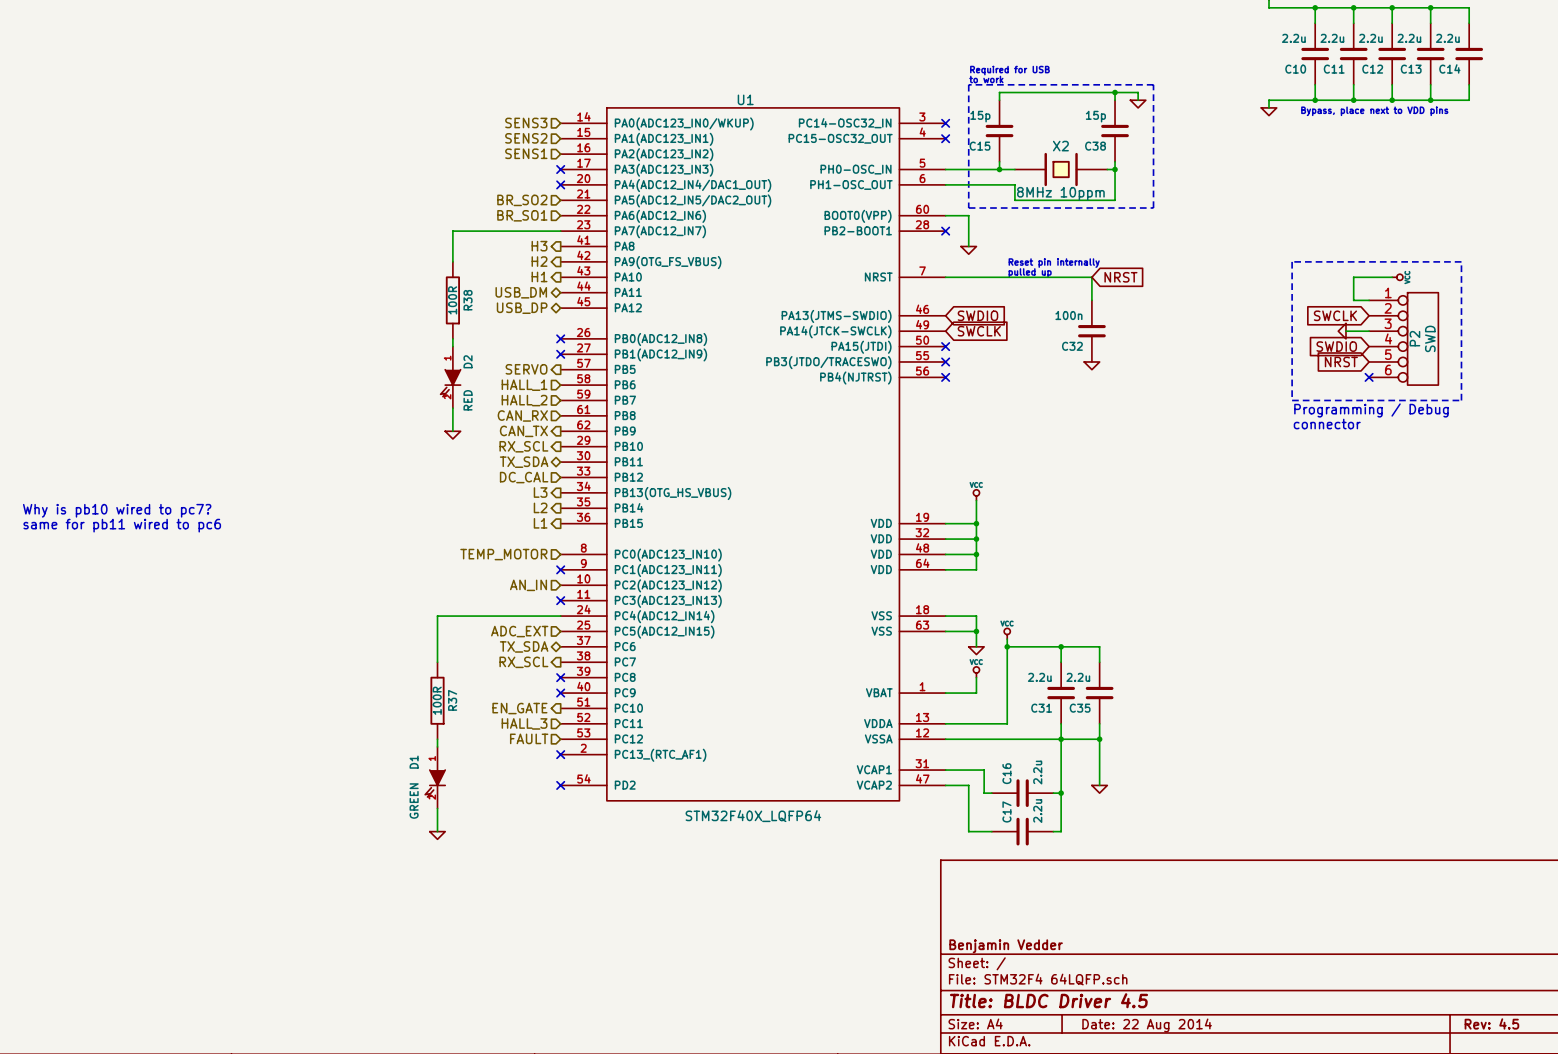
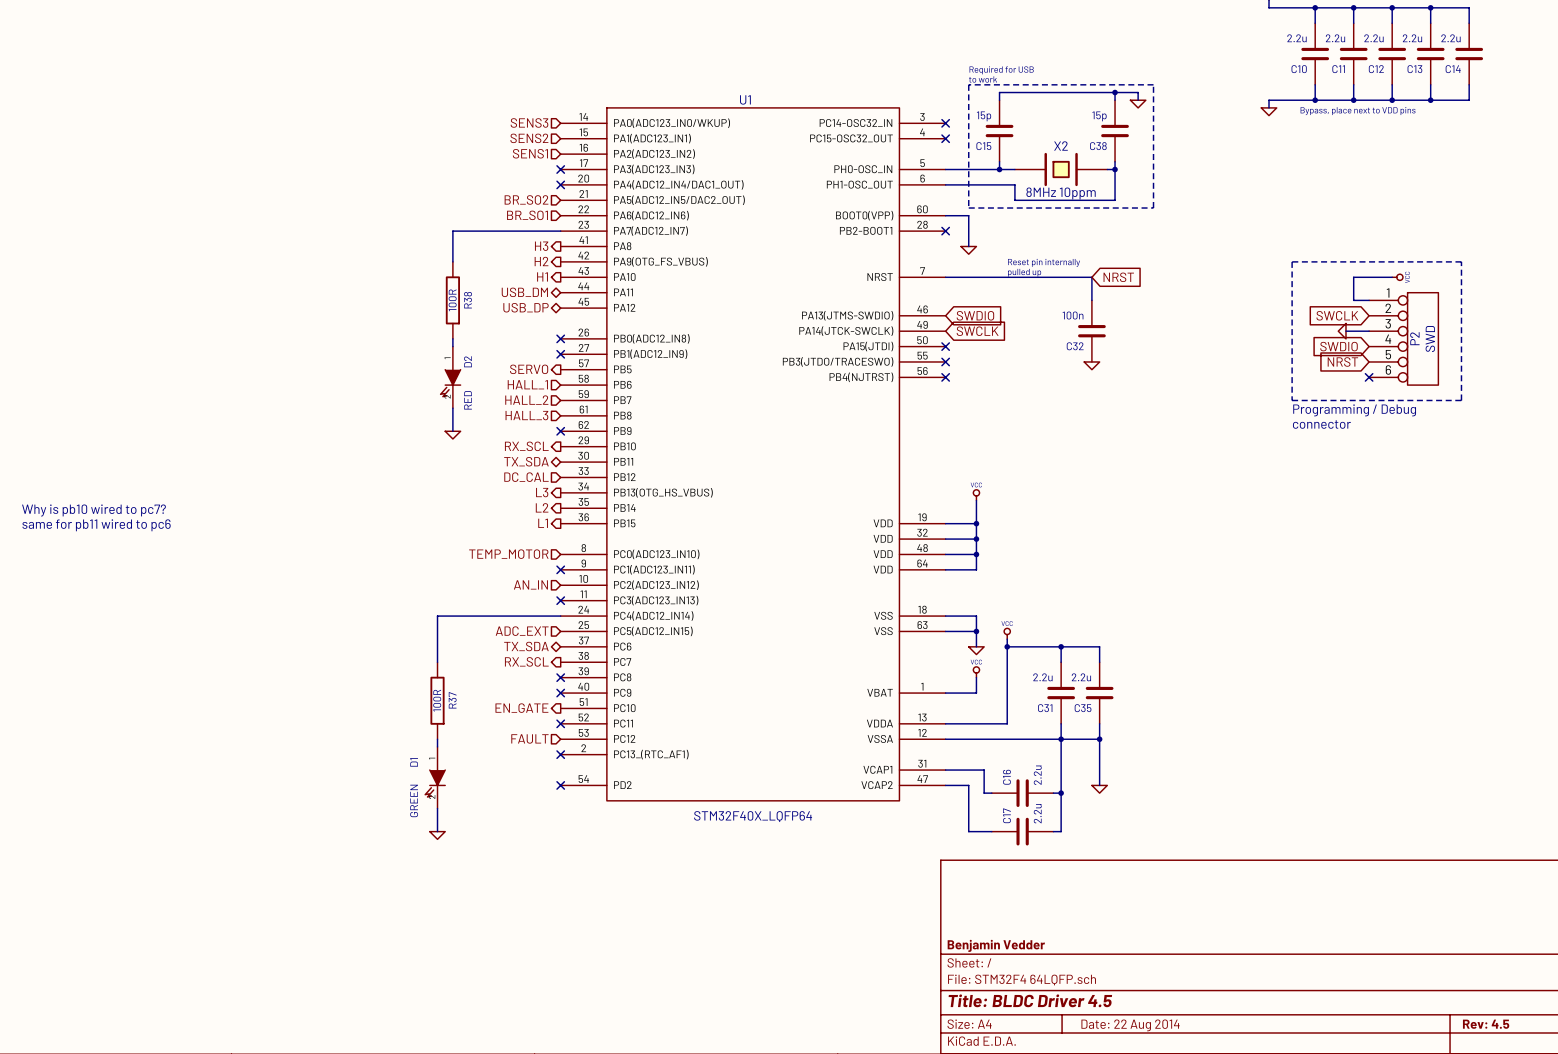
hierarchical label: CAN_RX (522, 415) -> HALL_3 (526, 415)
hierarchical label: CAN_TX (523, 431) -> none
no-connect mark: none -> (560, 431)
hierarchical label: HALL_3 (524, 723) -> none
no-connect mark: none -> (560, 723)

